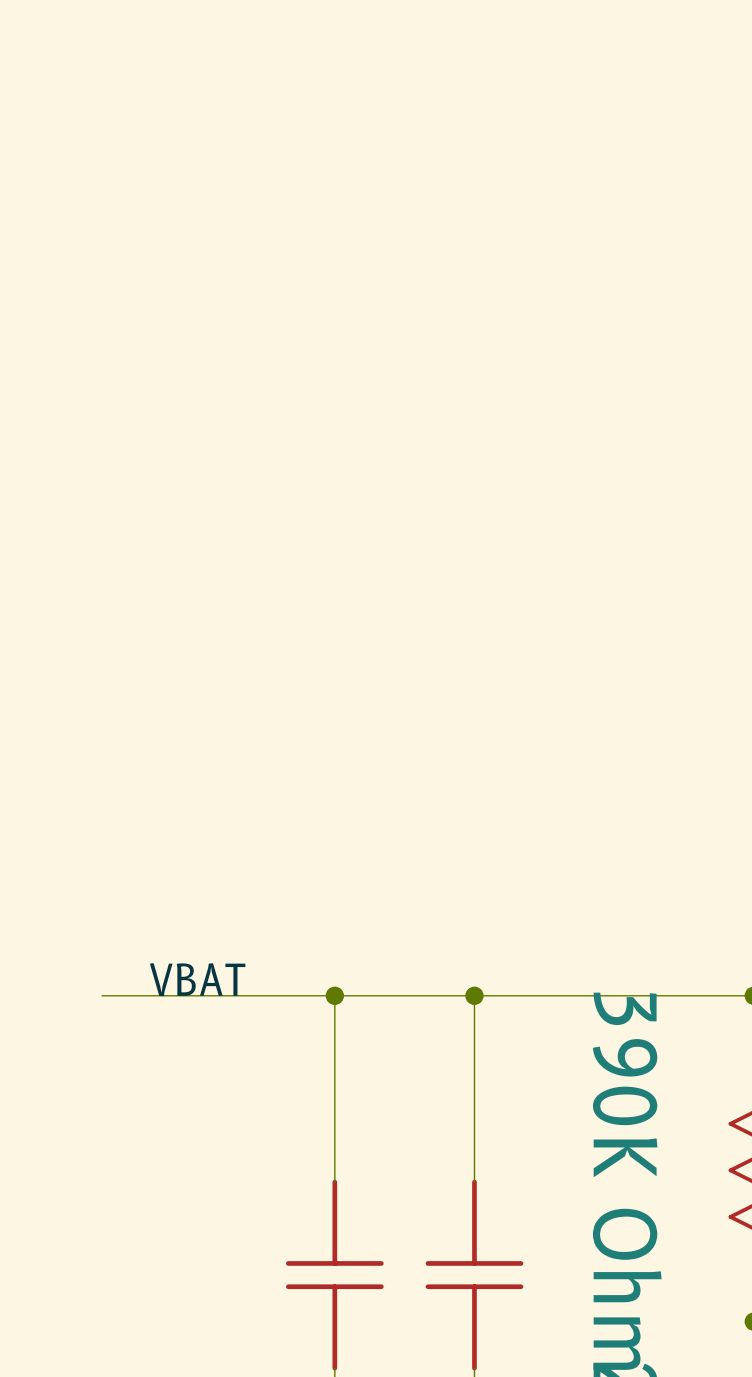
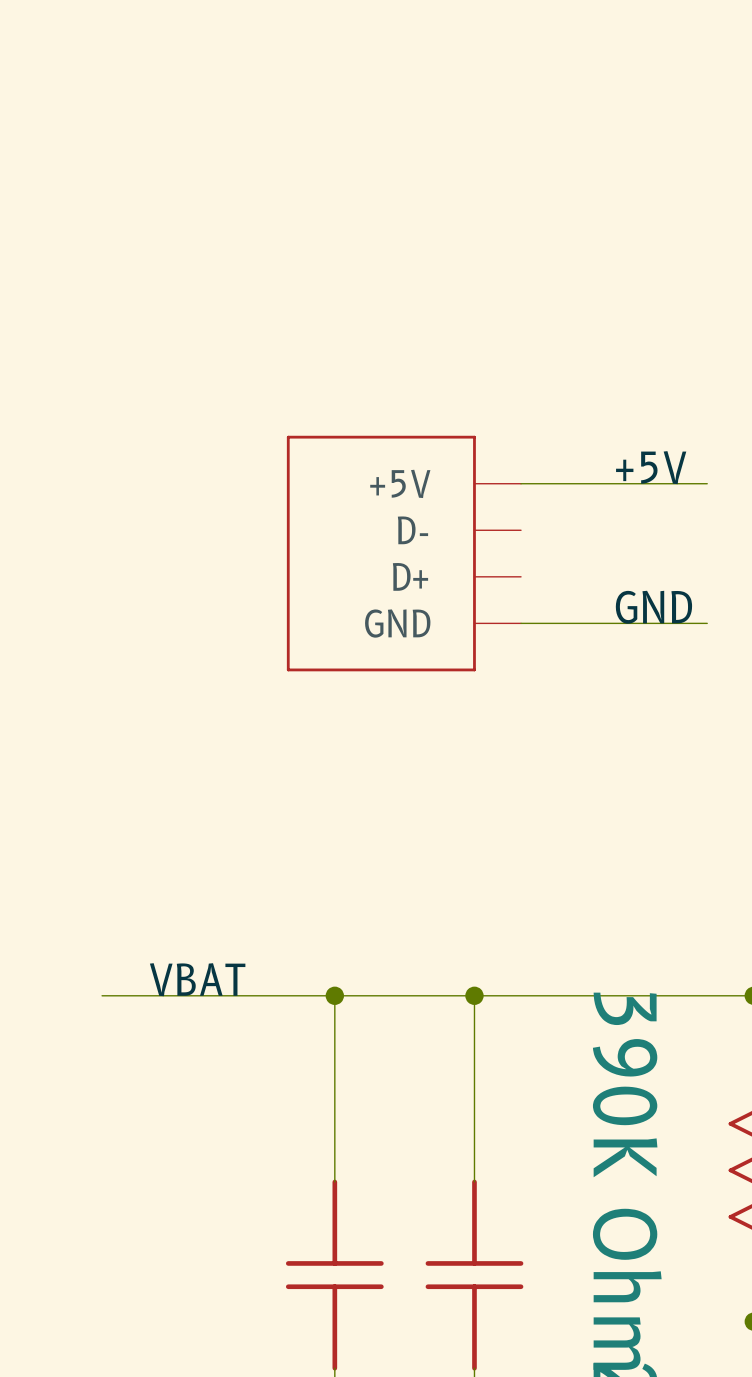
label: none -> +5V (651, 467)
wire: none -> (521, 483) (707, 483)
part: none -> (403, 553)
label: none -> GND (653, 607)
wire: none -> (521, 623) (707, 623)

